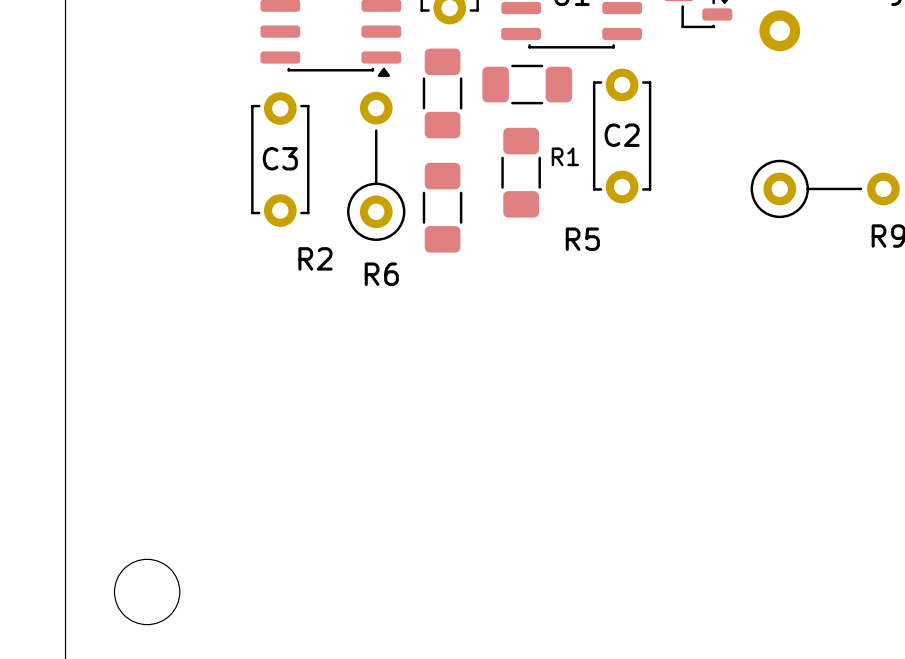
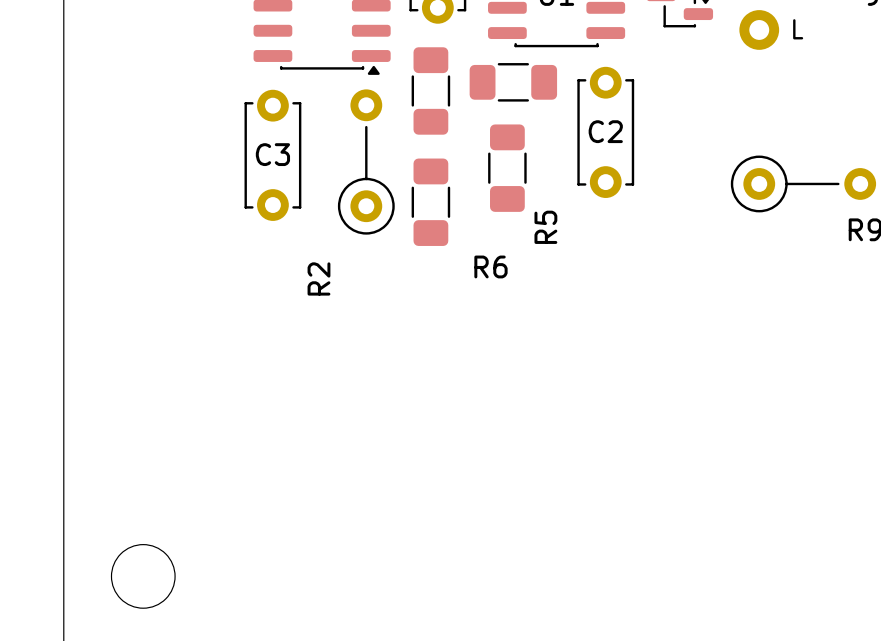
text: none -> L (798, 29)
R1 name: R1 (565, 156) -> none
R5 name rotation: 0° (582, 239) -> 90° counterclockwise (545, 227)
R2 name rotation: 0° (315, 258) -> 90° counterclockwise (318, 278)
R6 name position: R6 (381, 274) -> R6 (490, 266)

